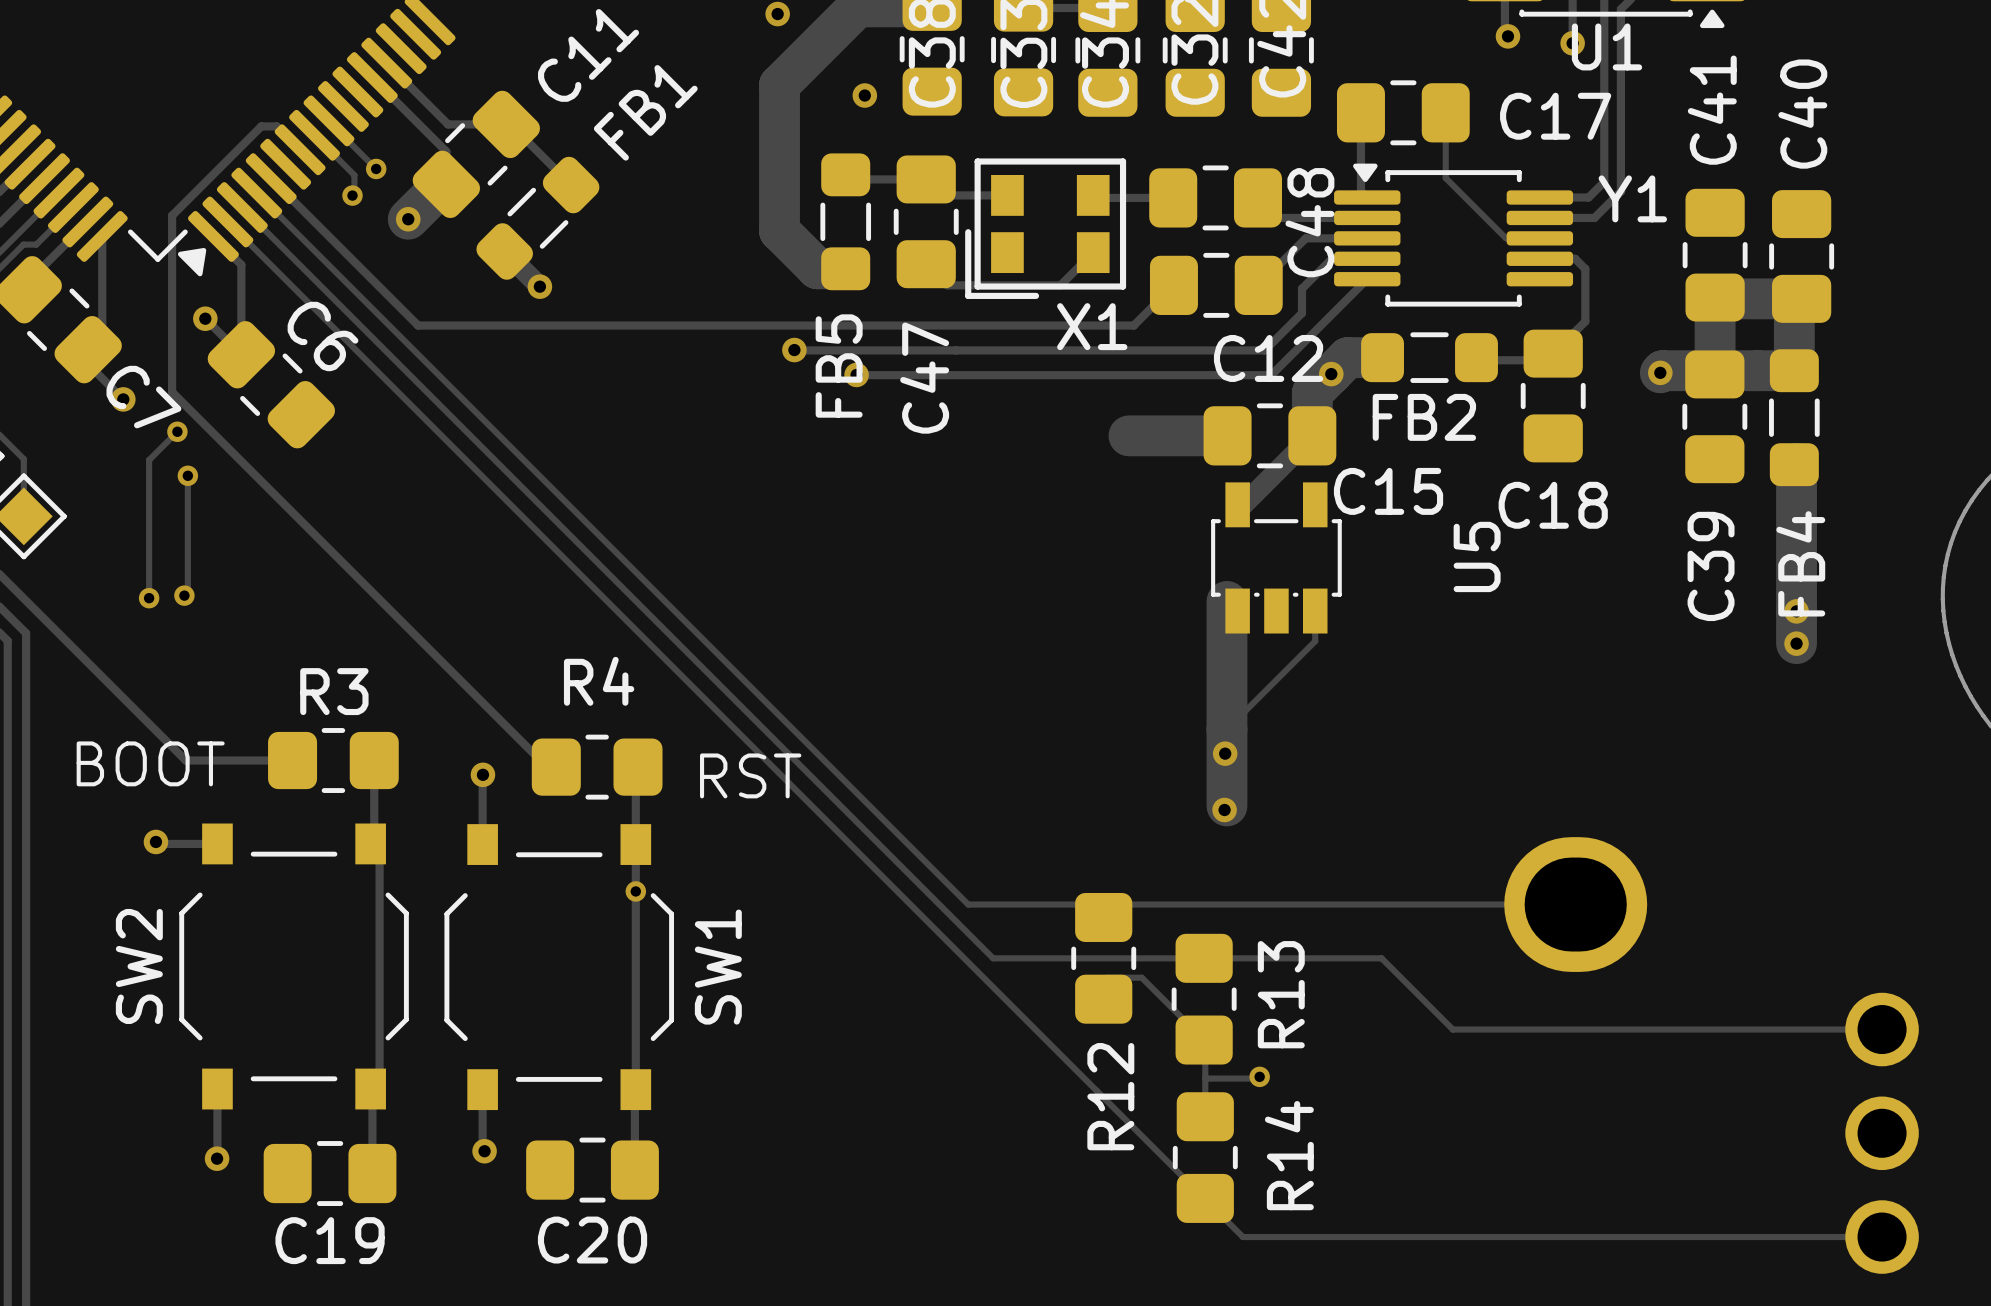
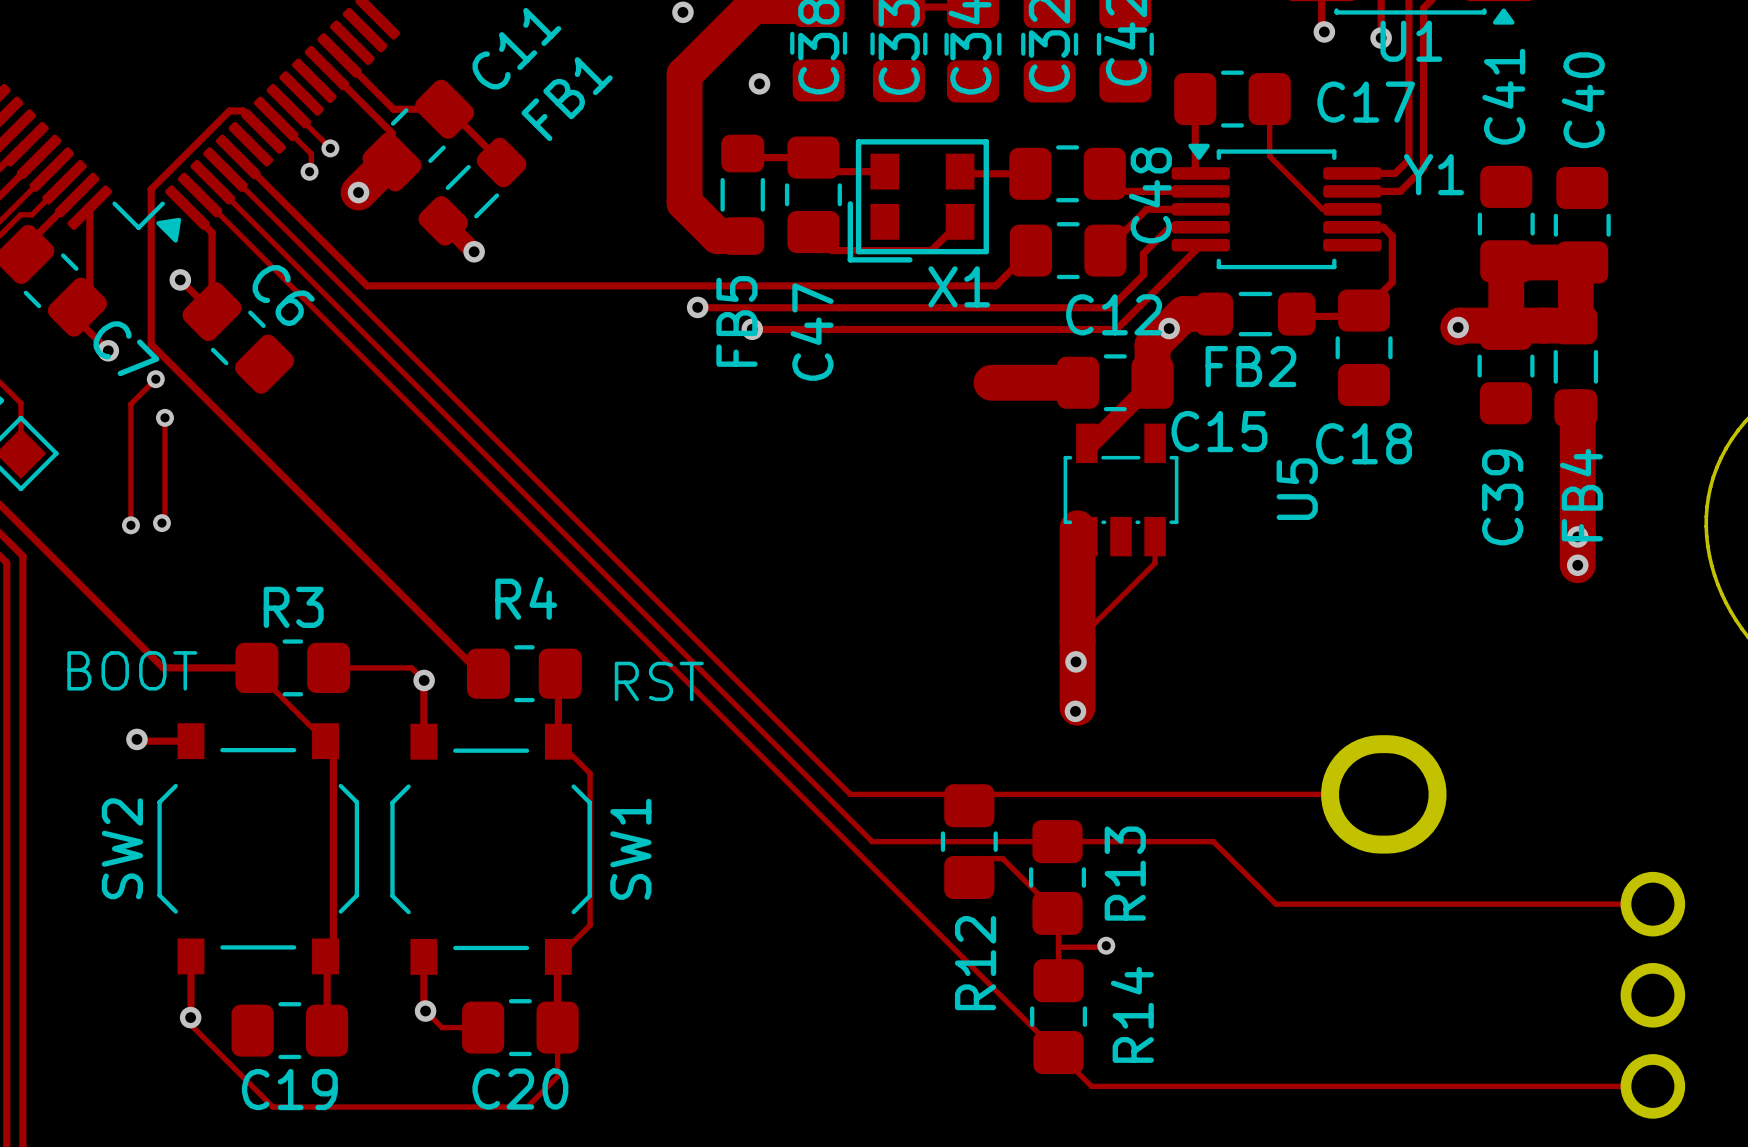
track: none -> (256, 667) (256, 672) (325, 741)
track: (374, 760) (374, 837) -> (328, 667) (411, 667) (424, 680)
track: (635, 844) (635, 1089) -> (558, 741) (590, 773) (590, 925) (558, 956)
via: (635, 891) -> none
track: none -> (425, 1011) (442, 1027) (483, 1027)
track: none -> (190, 1017) (190, 1024) (272, 1107) (527, 1107) (557, 1076) (557, 1027)

